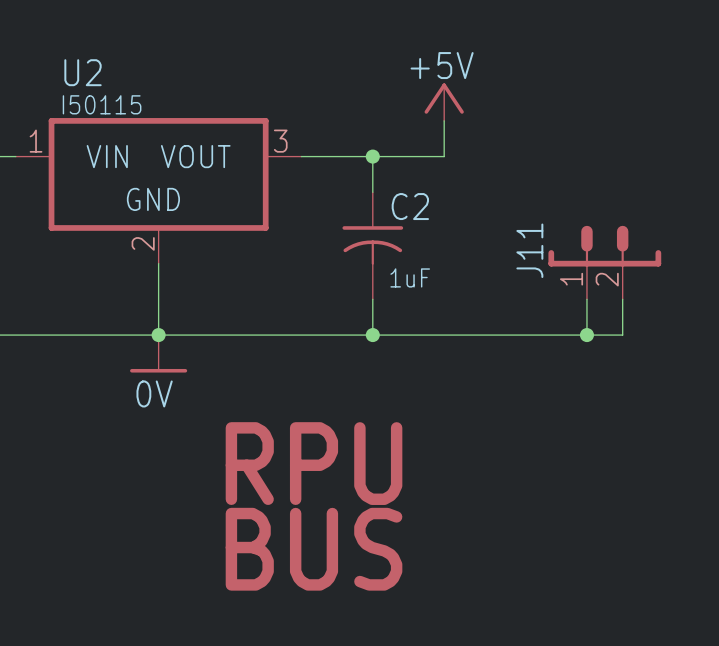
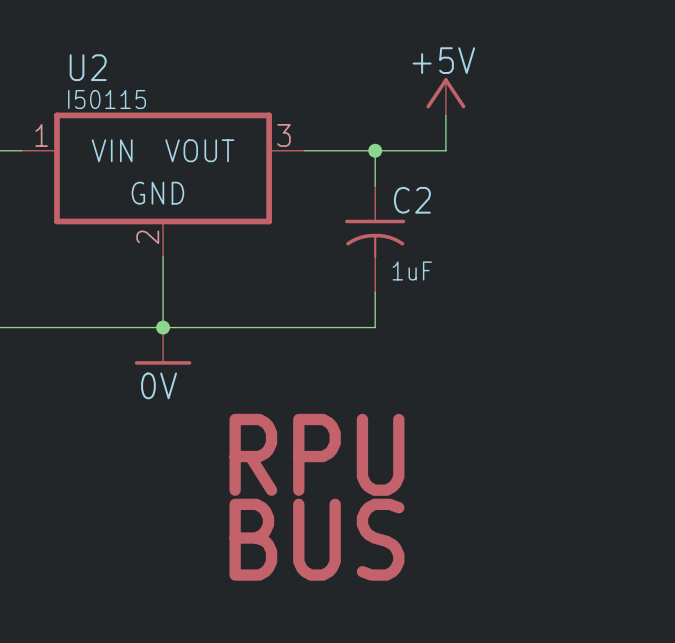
J11: (604, 262) -> none
wire: (586, 299) (586, 335) -> none
wire: (622, 299) (622, 335) (372, 335) -> none
junction: (372, 335) -> none
junction: (586, 335) -> none

